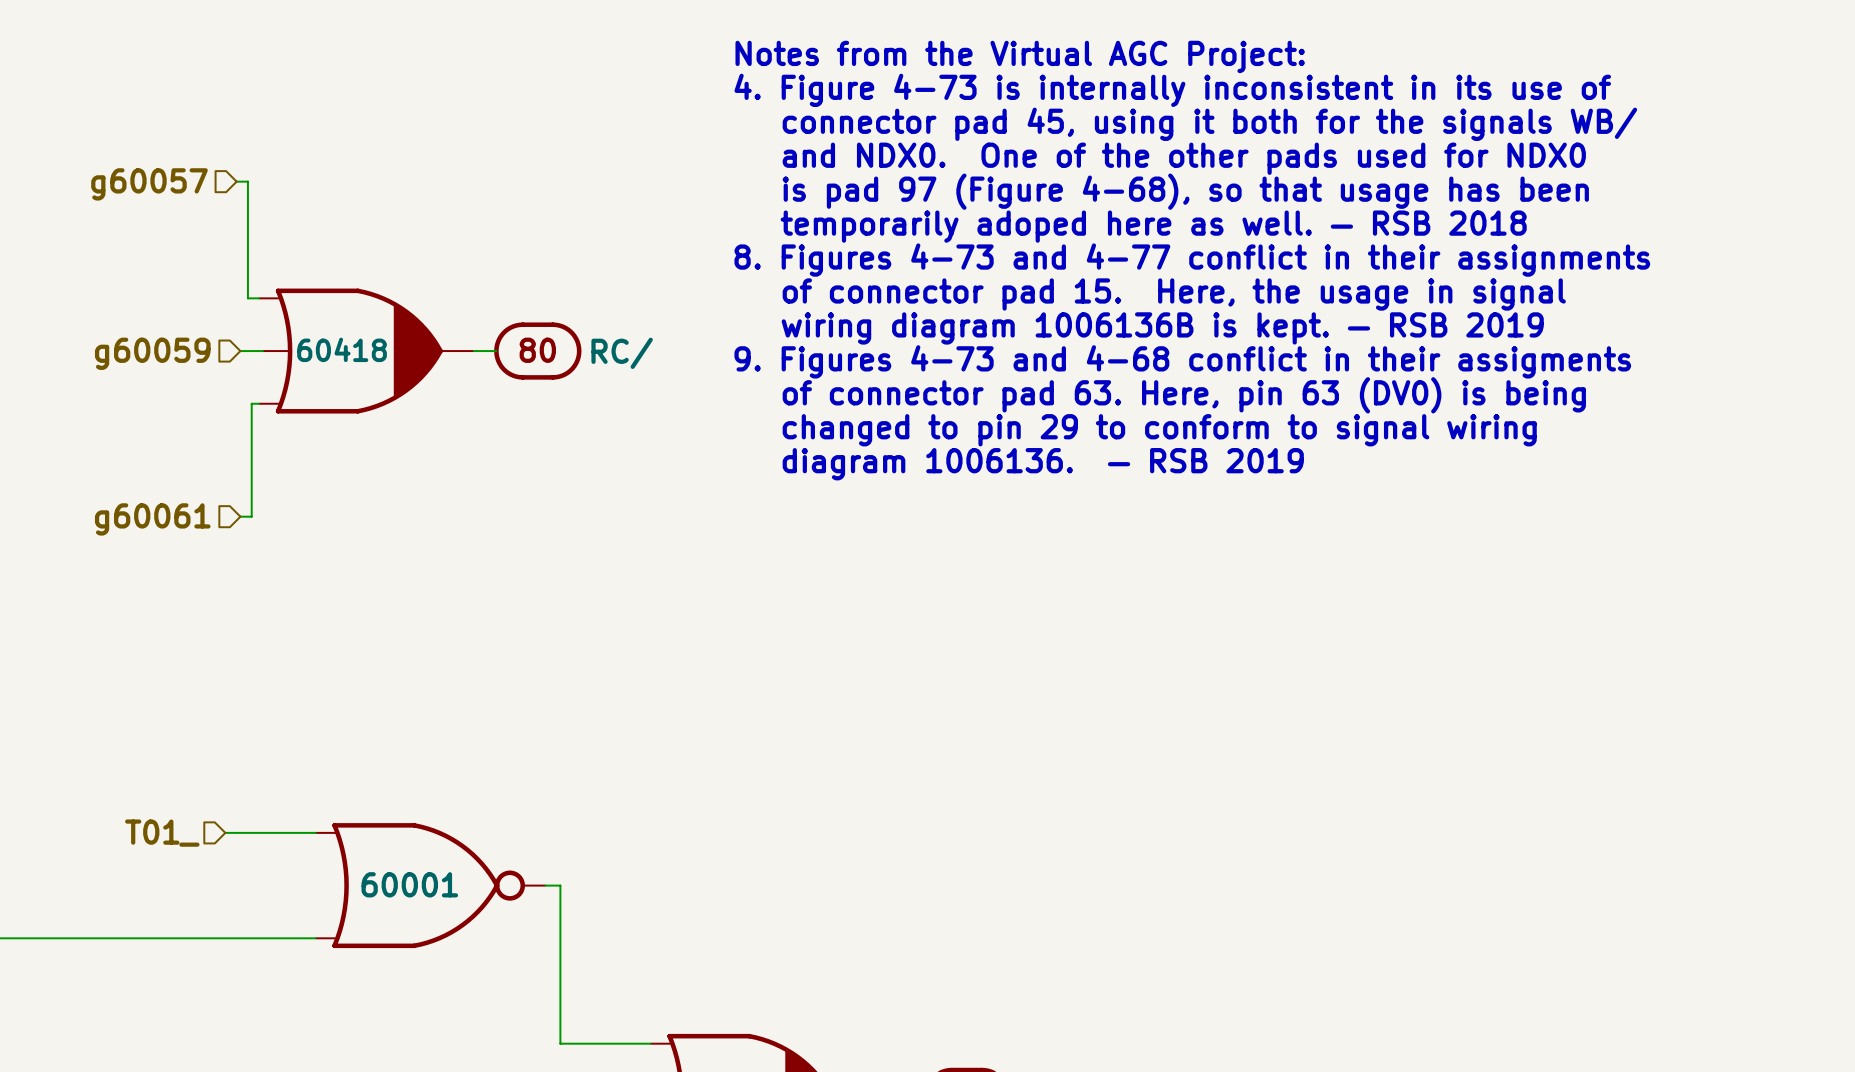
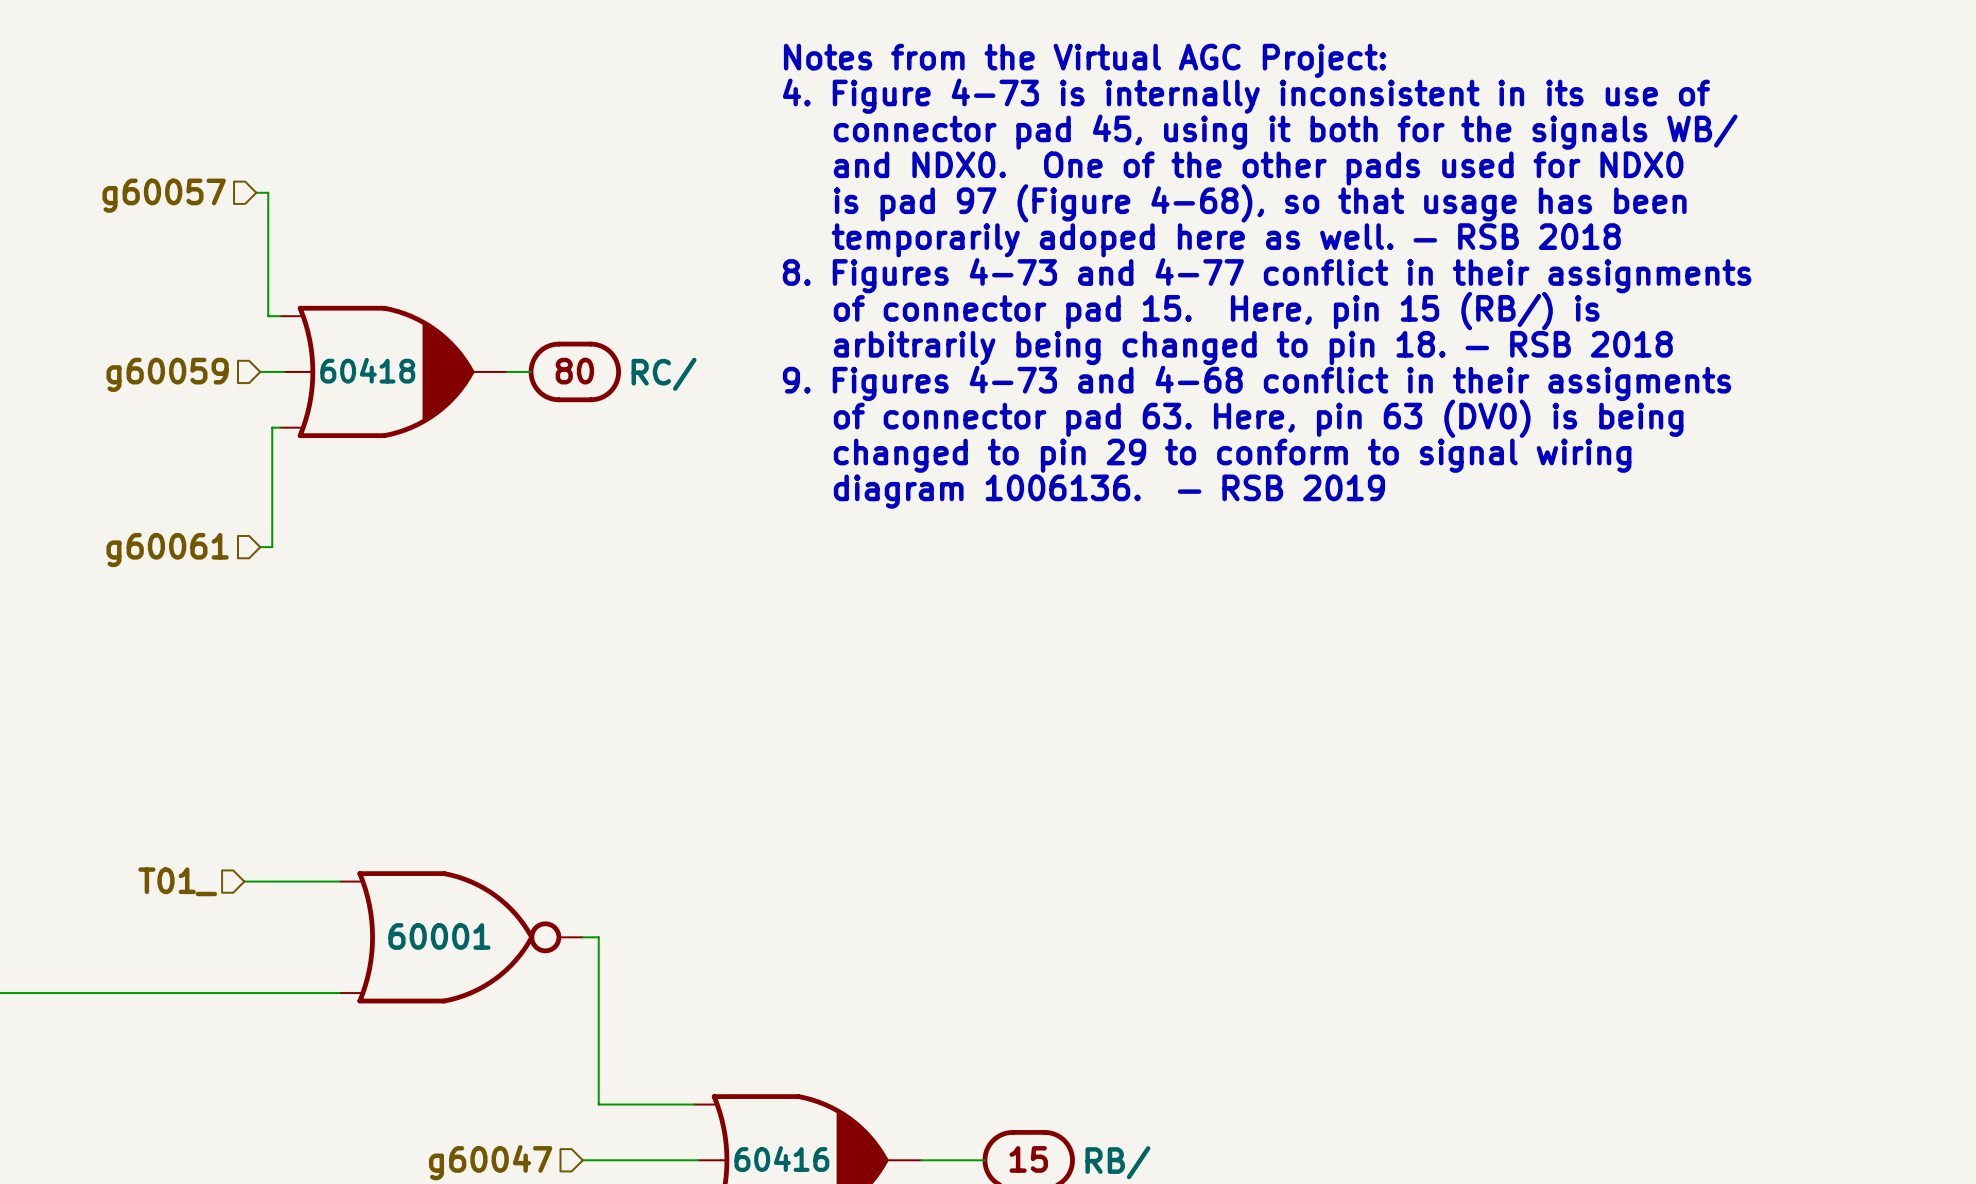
text: of connector pad 15. Here, the usage in signal (1174, 294) -> of connector pad 15. Here, pin 15 (RB/) is (1216, 311)
text: wiring diagram 1006136B is kept. — RSB 2019 (1162, 328) -> arbitrarily being changed to pin 18. — RSB 2018 (1253, 348)

